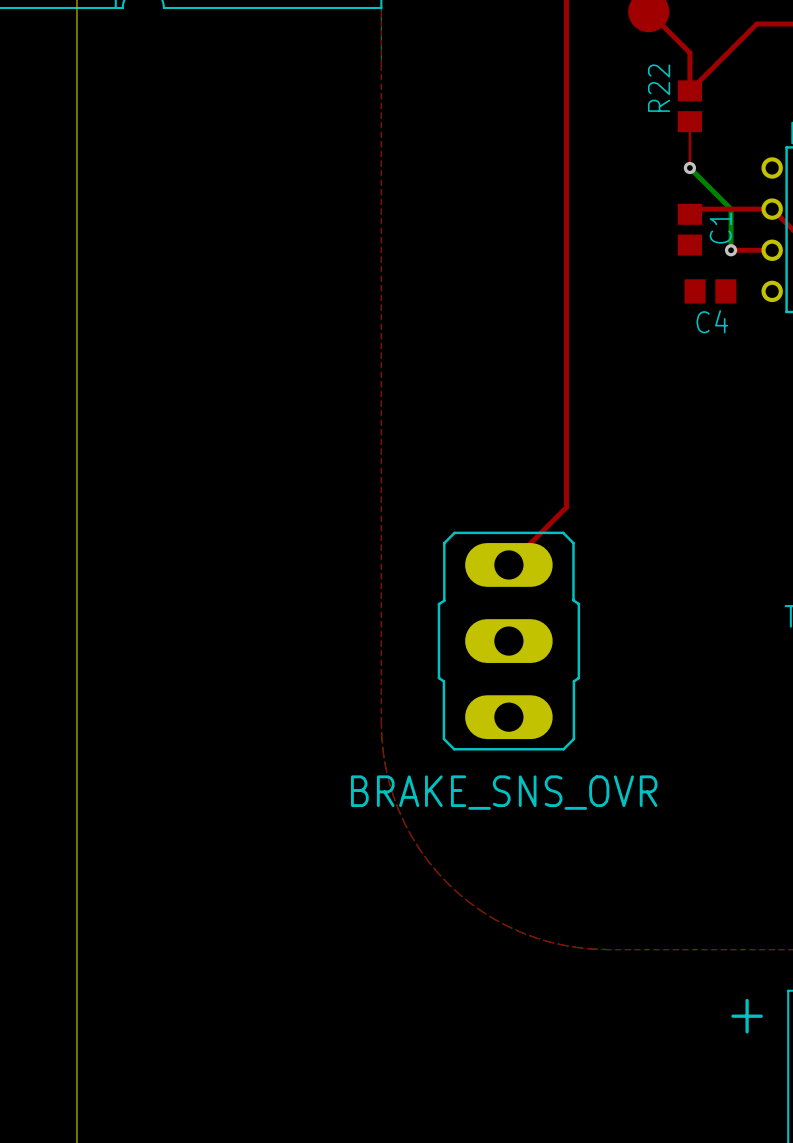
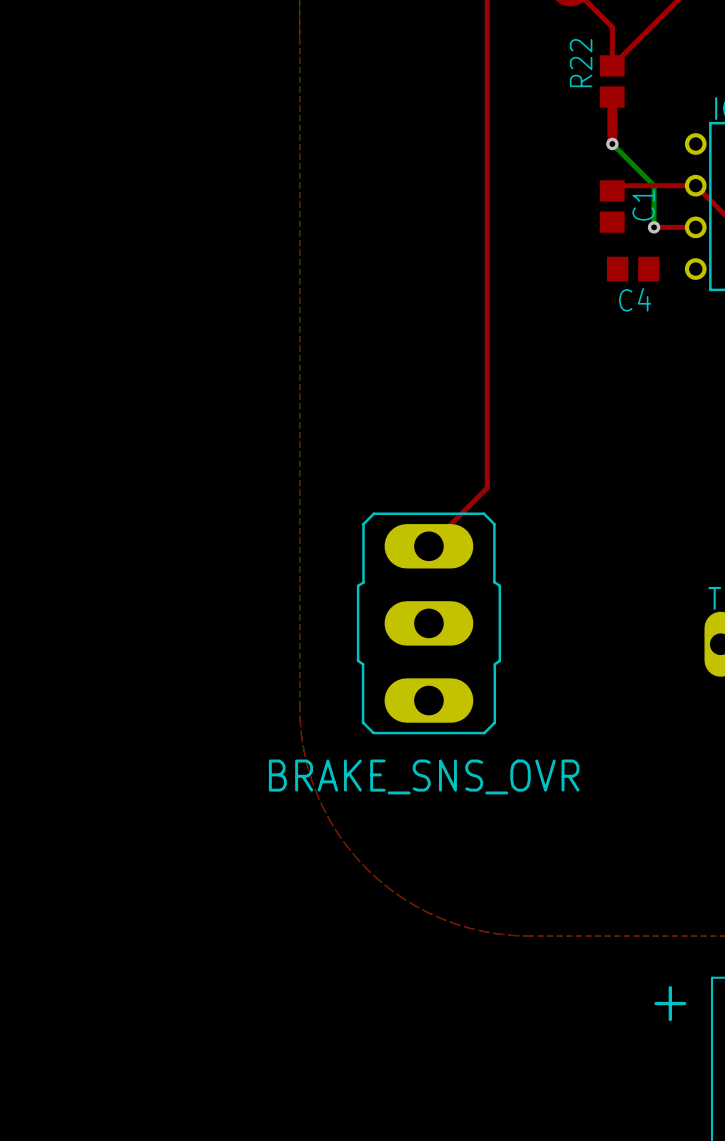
top track width: thin (689, 121) (689, 167) -> thick (612, 97) (612, 143)

